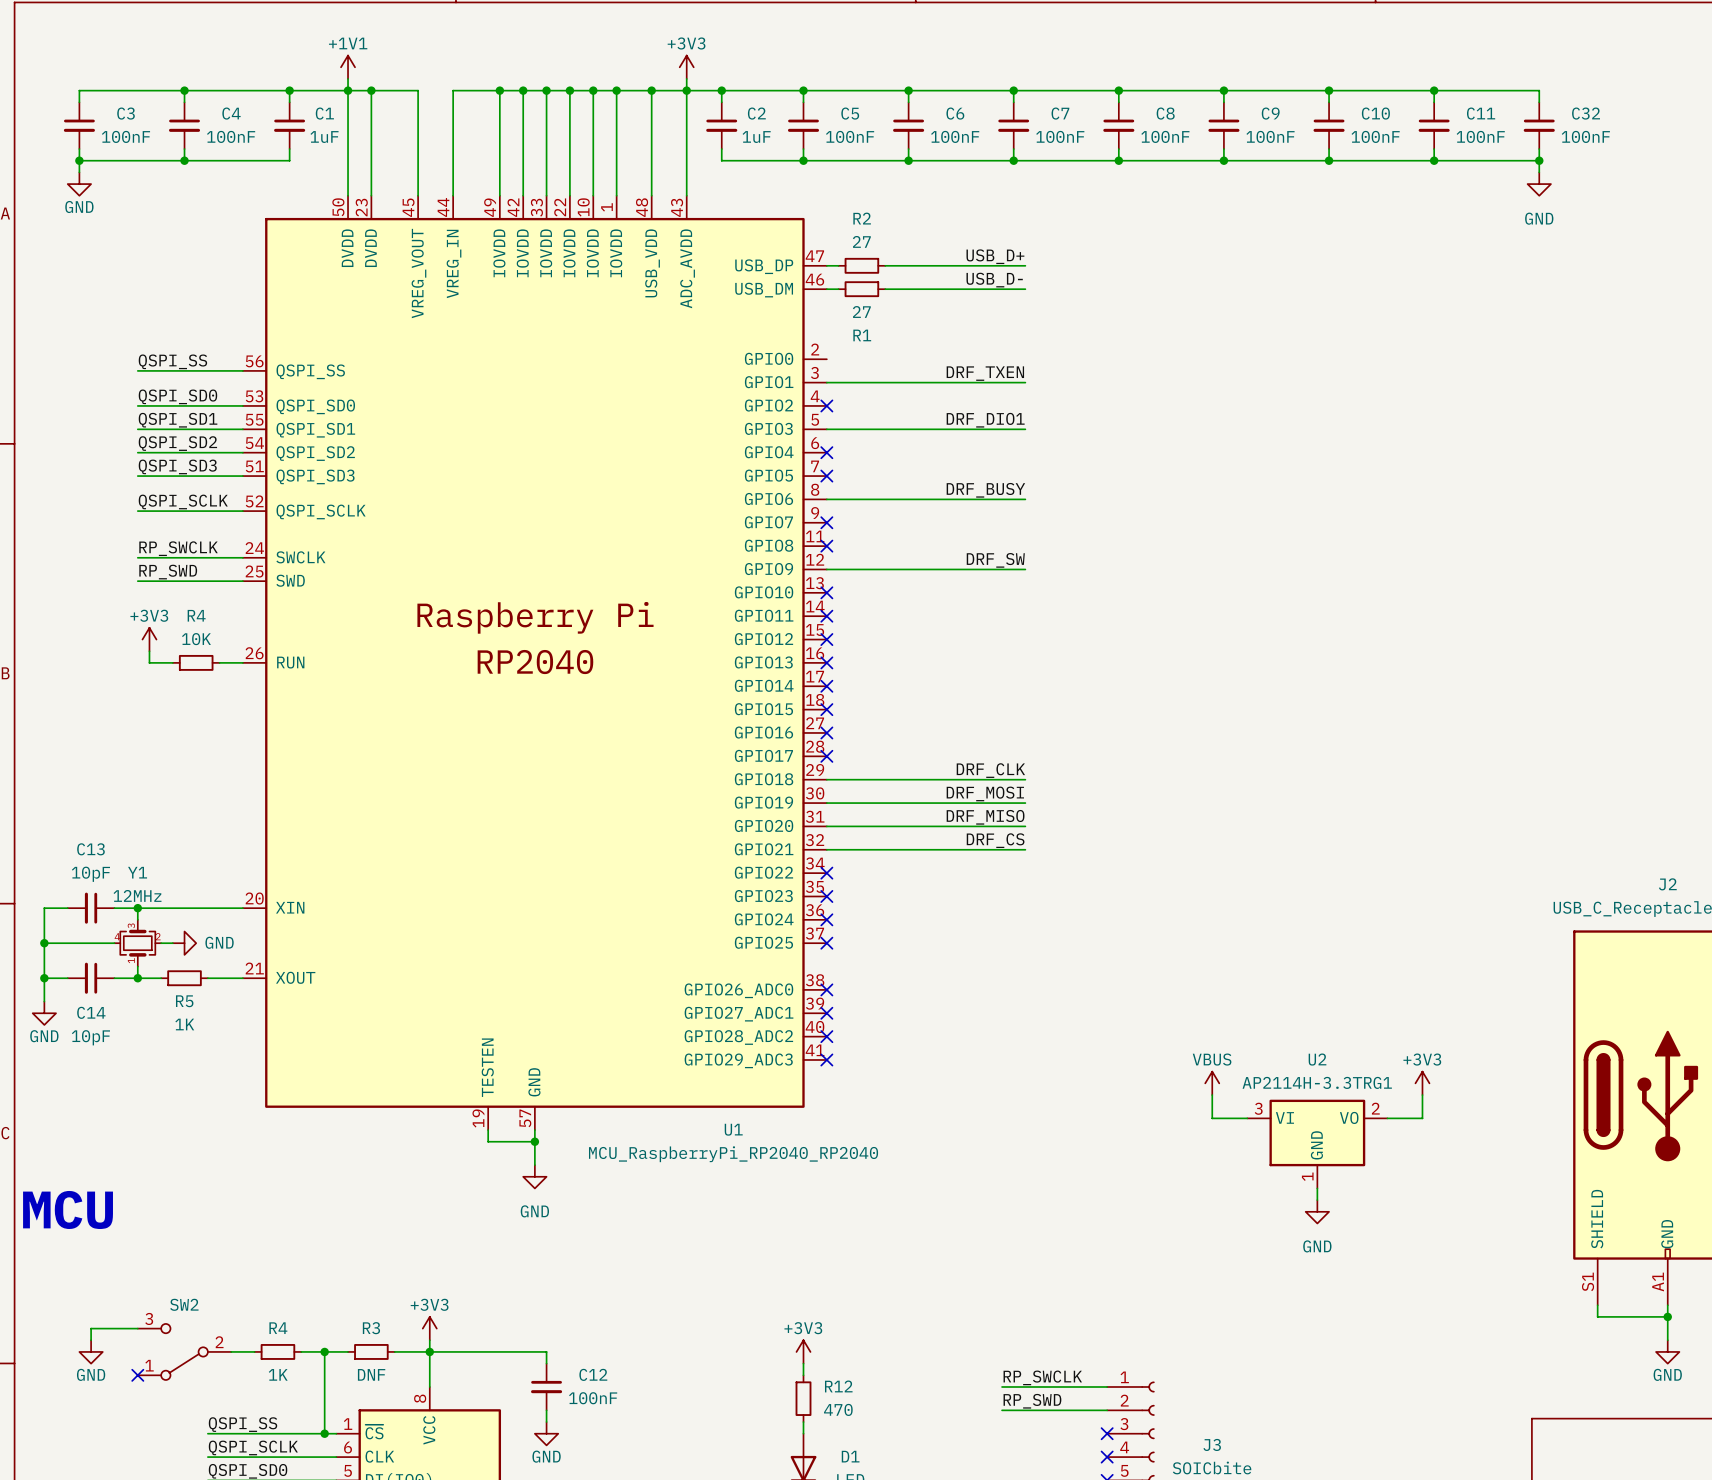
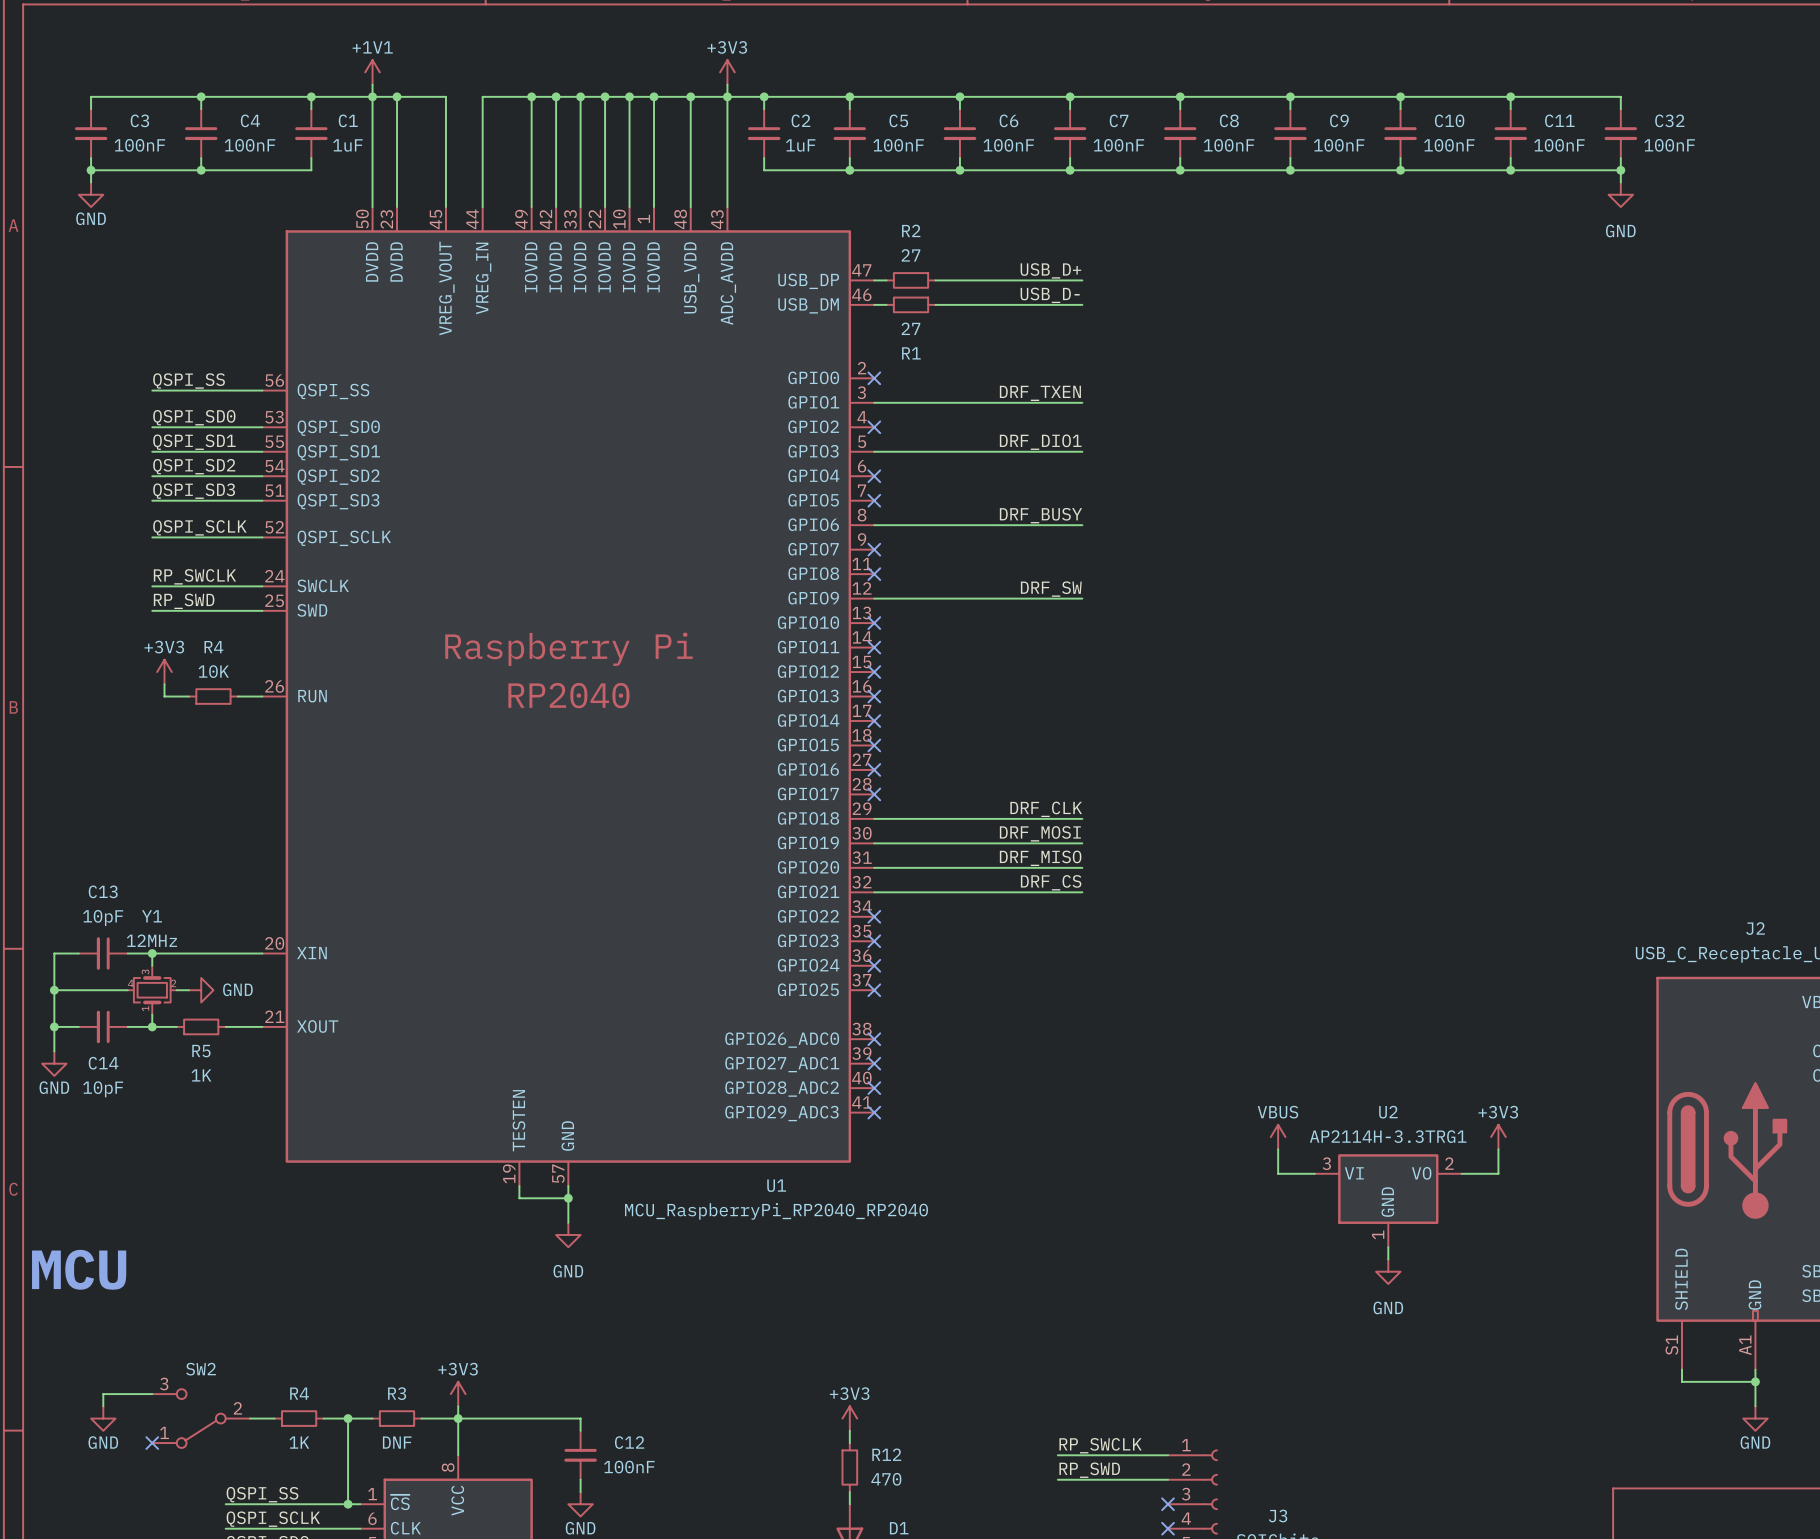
no-connect mark: none -> (874, 378)

